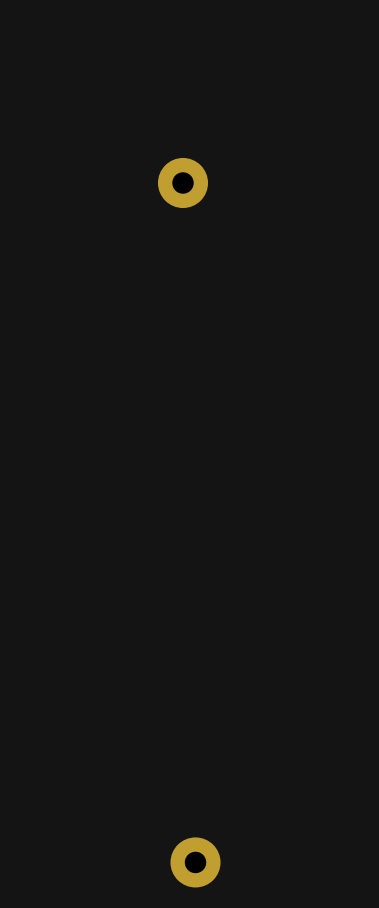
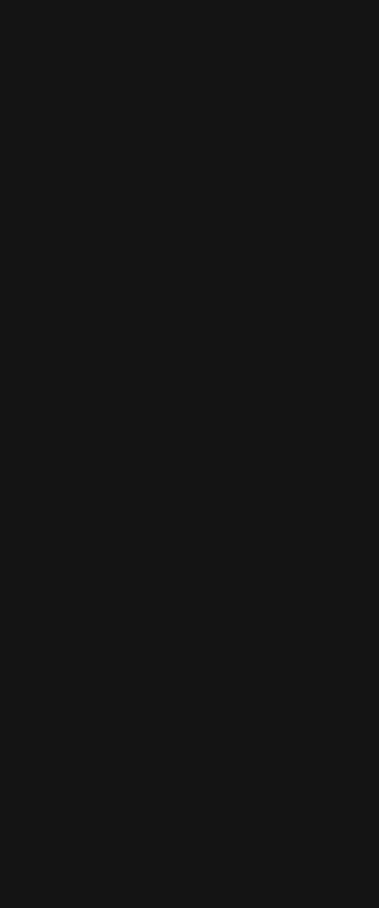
via: (183, 183) -> none
via: (195, 862) -> none

